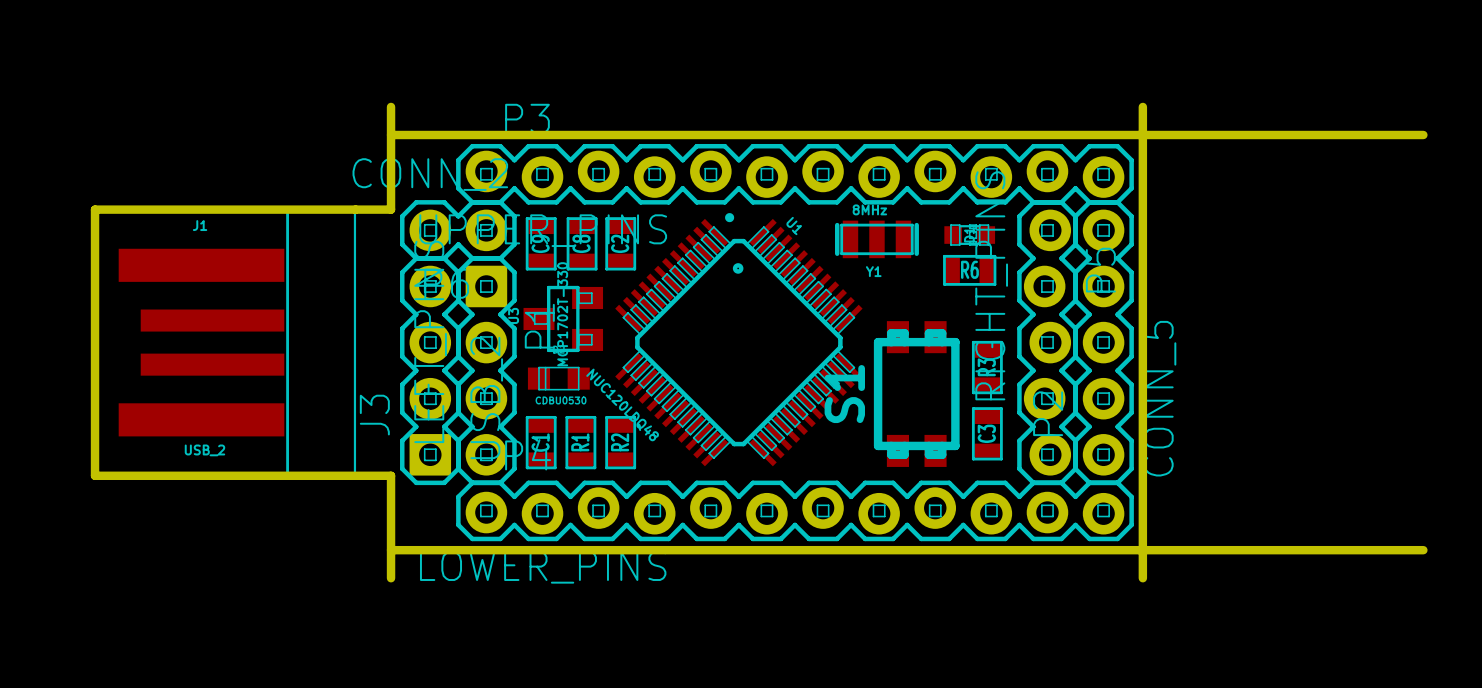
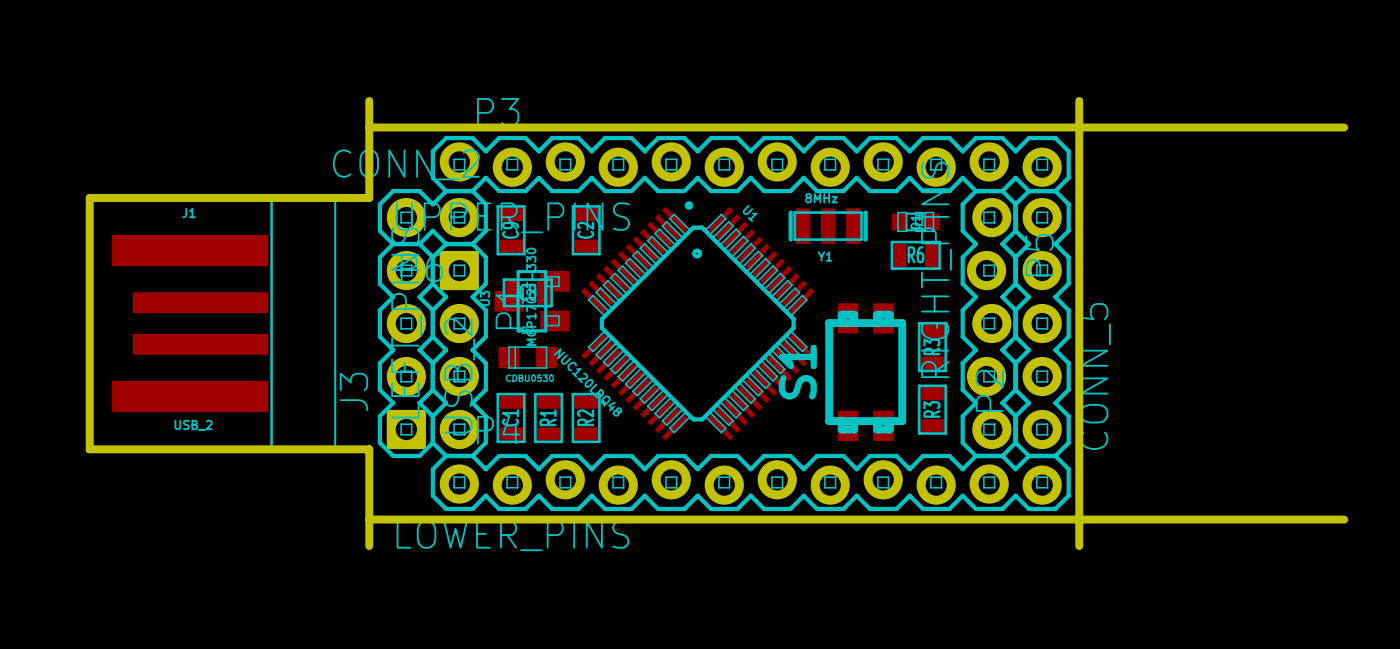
C8 rotation: 0° (582, 243) -> 90° clockwise (527, 292)
C8 position: (582, 243) -> (527, 292)
C3 name: C3 (986, 433) -> R3 (931, 409)

